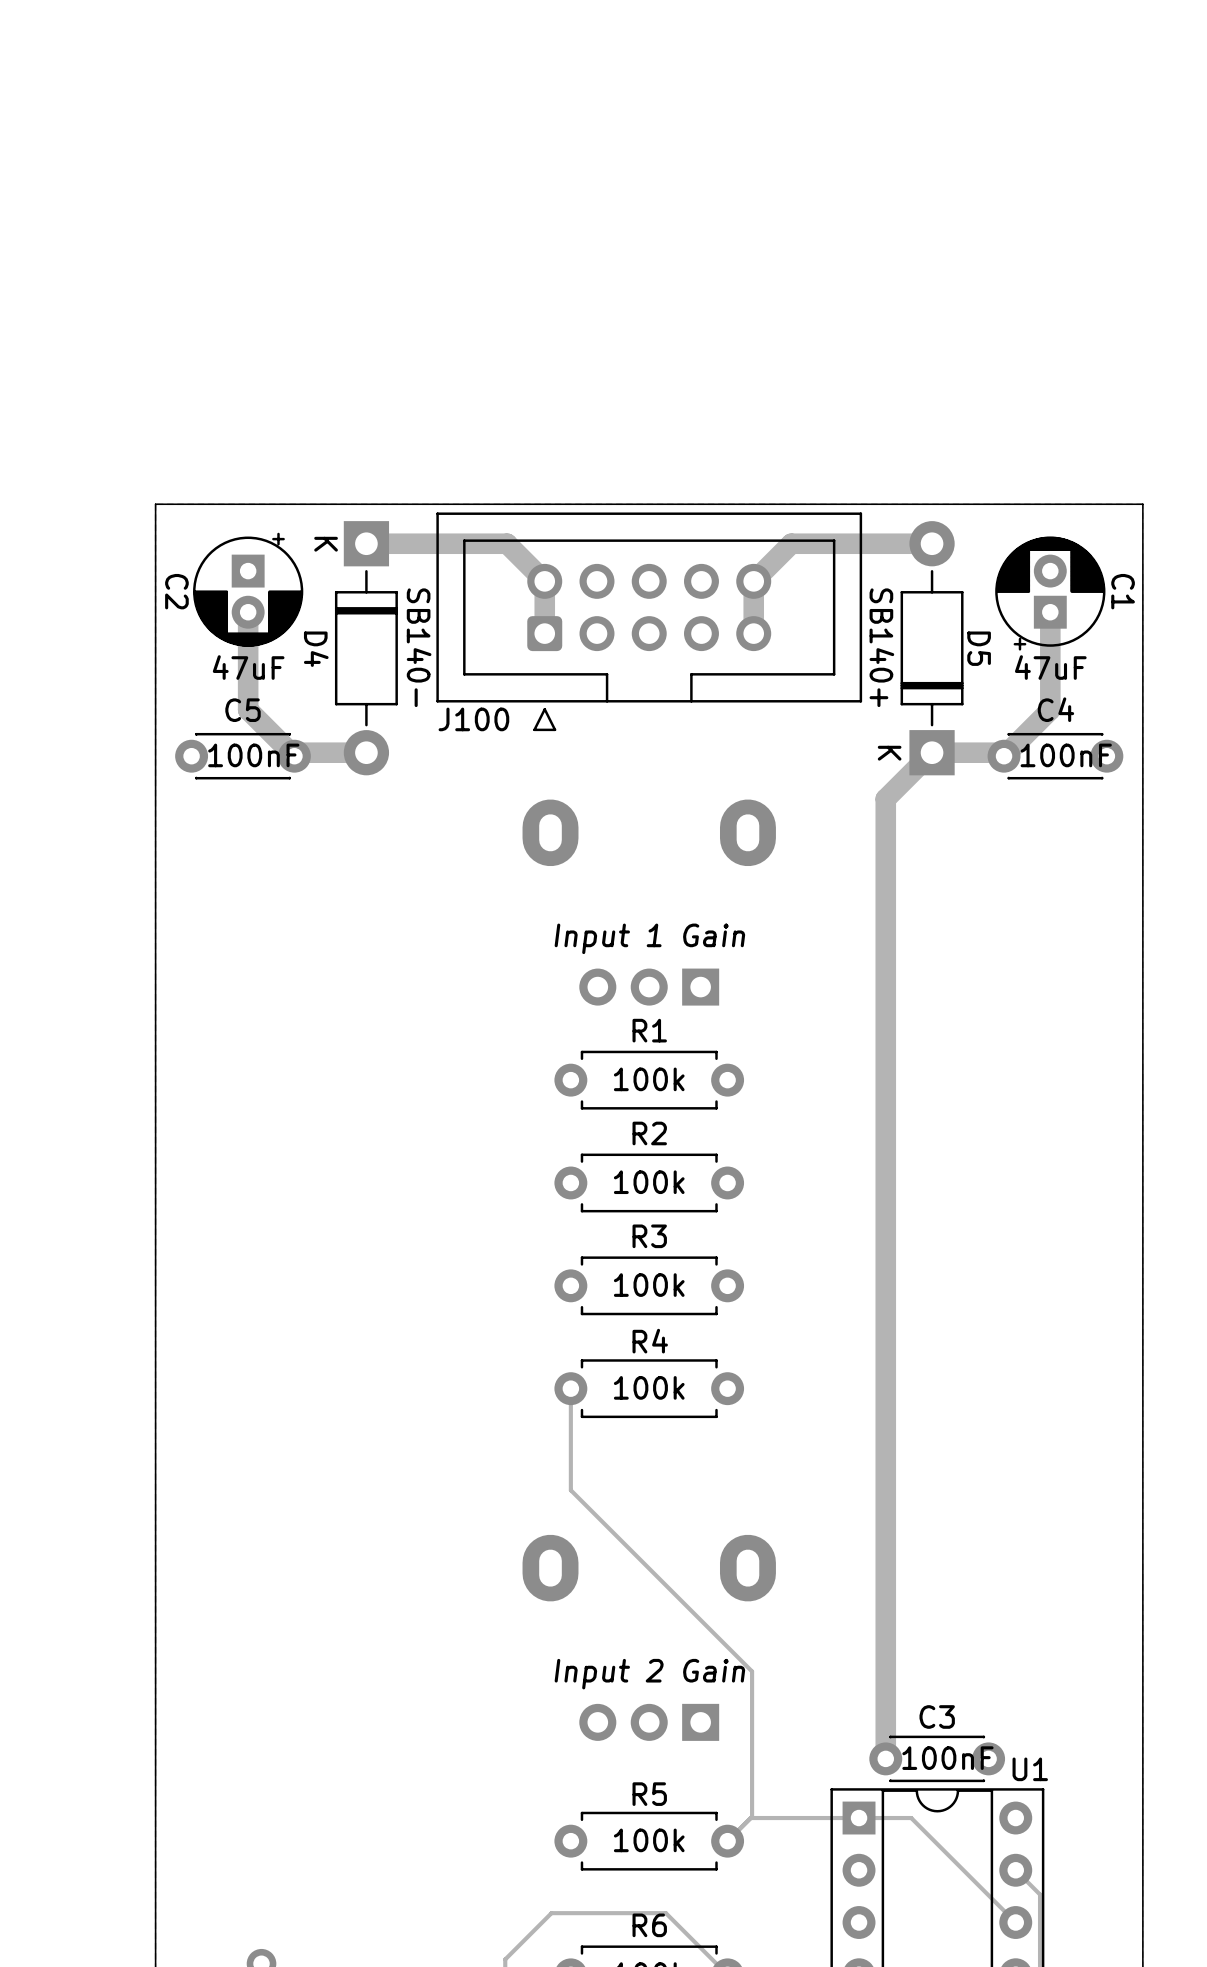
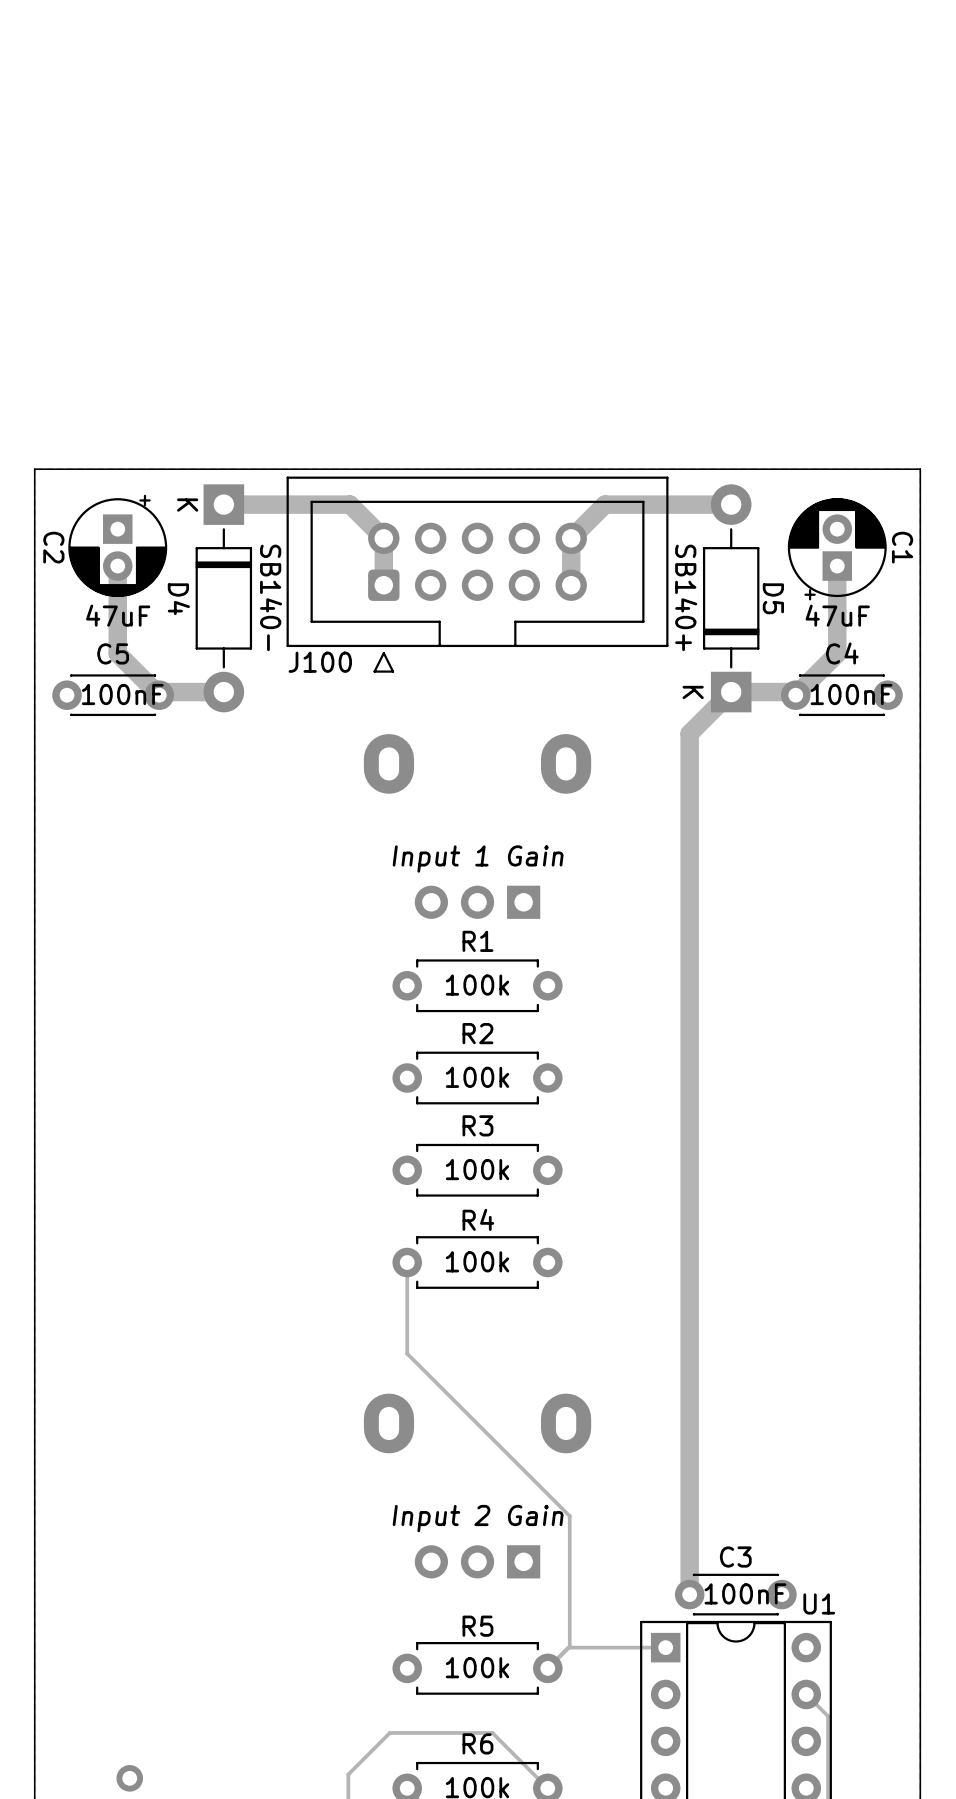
track: (859, 1818) (911, 1818) (1015, 1922) -> none

